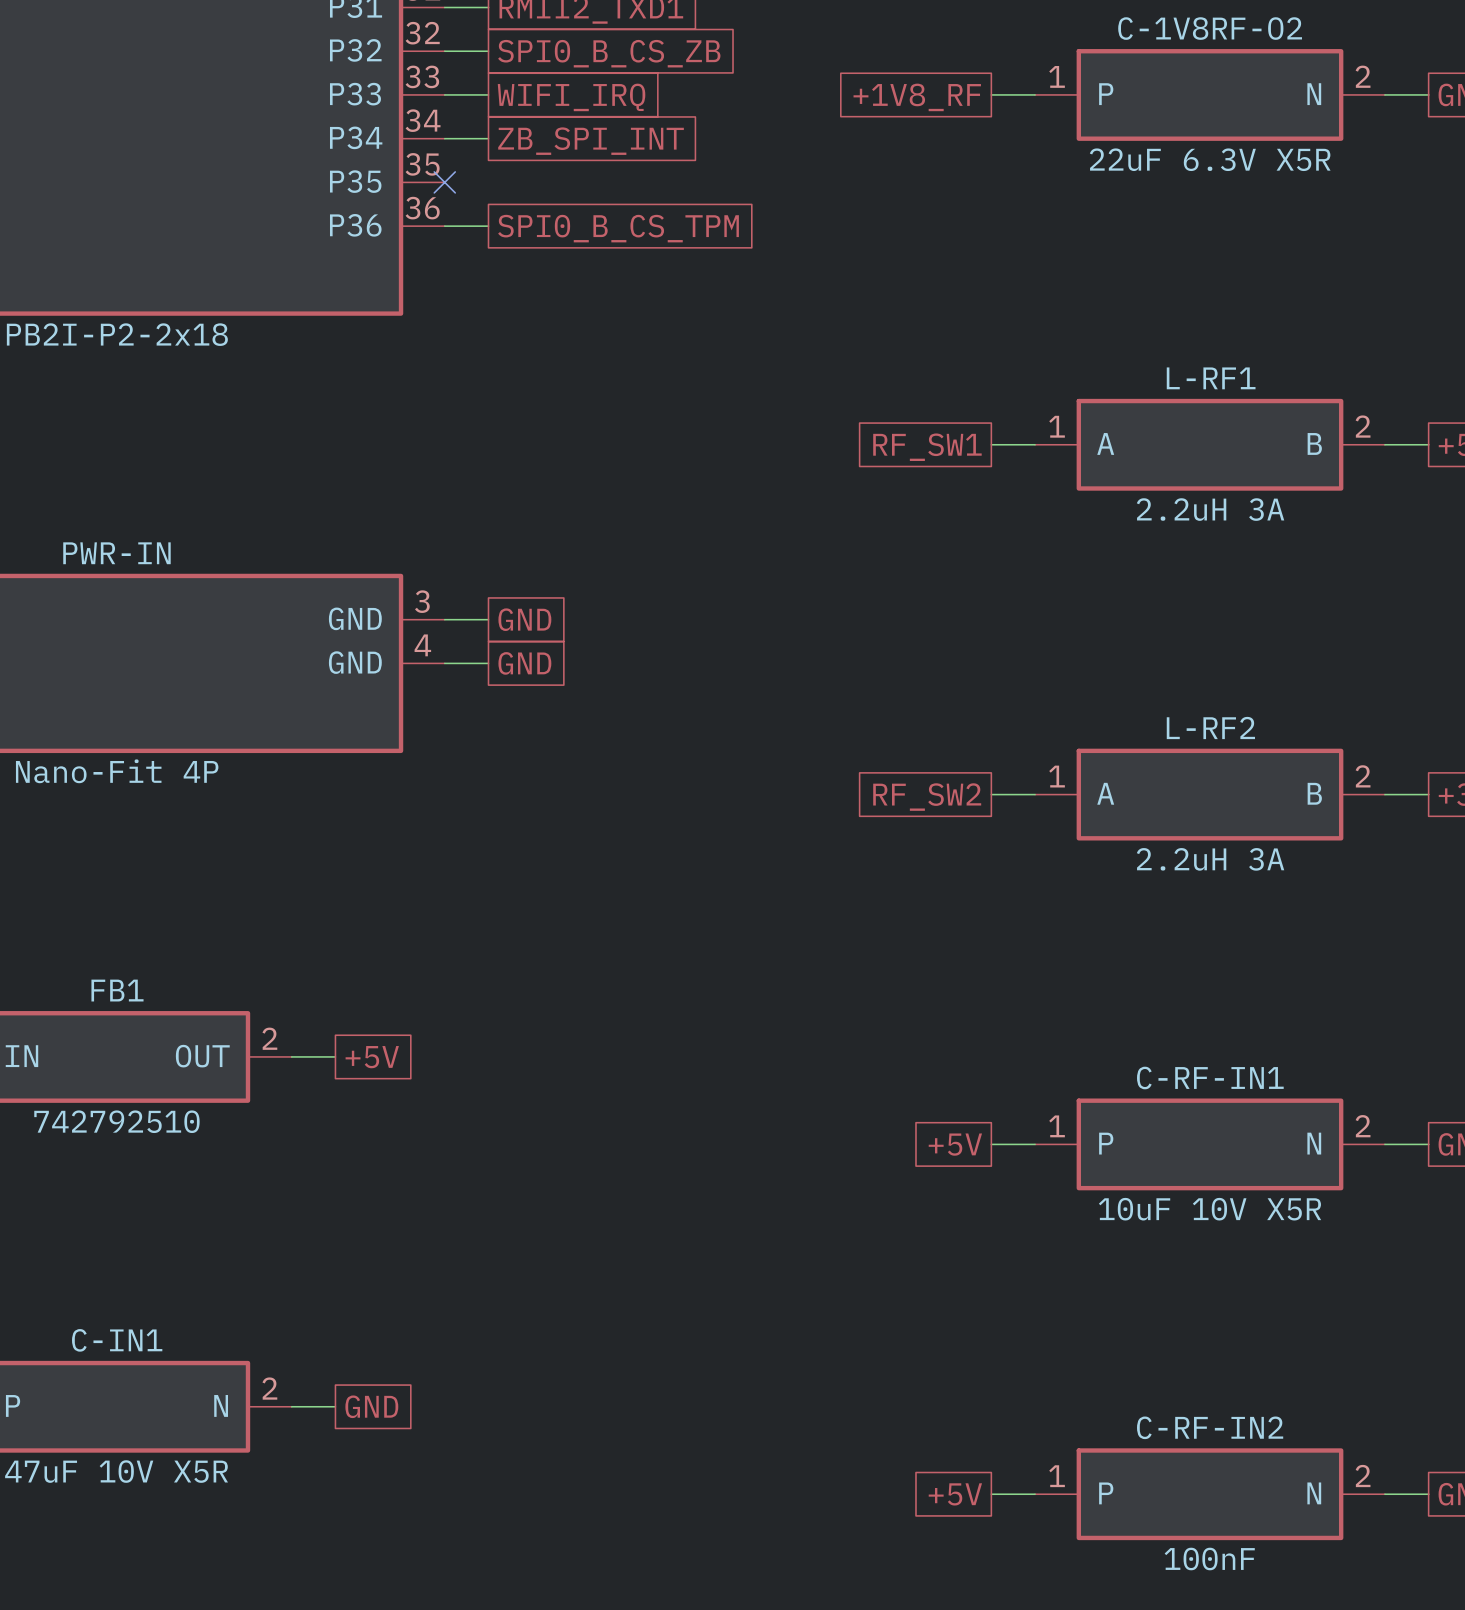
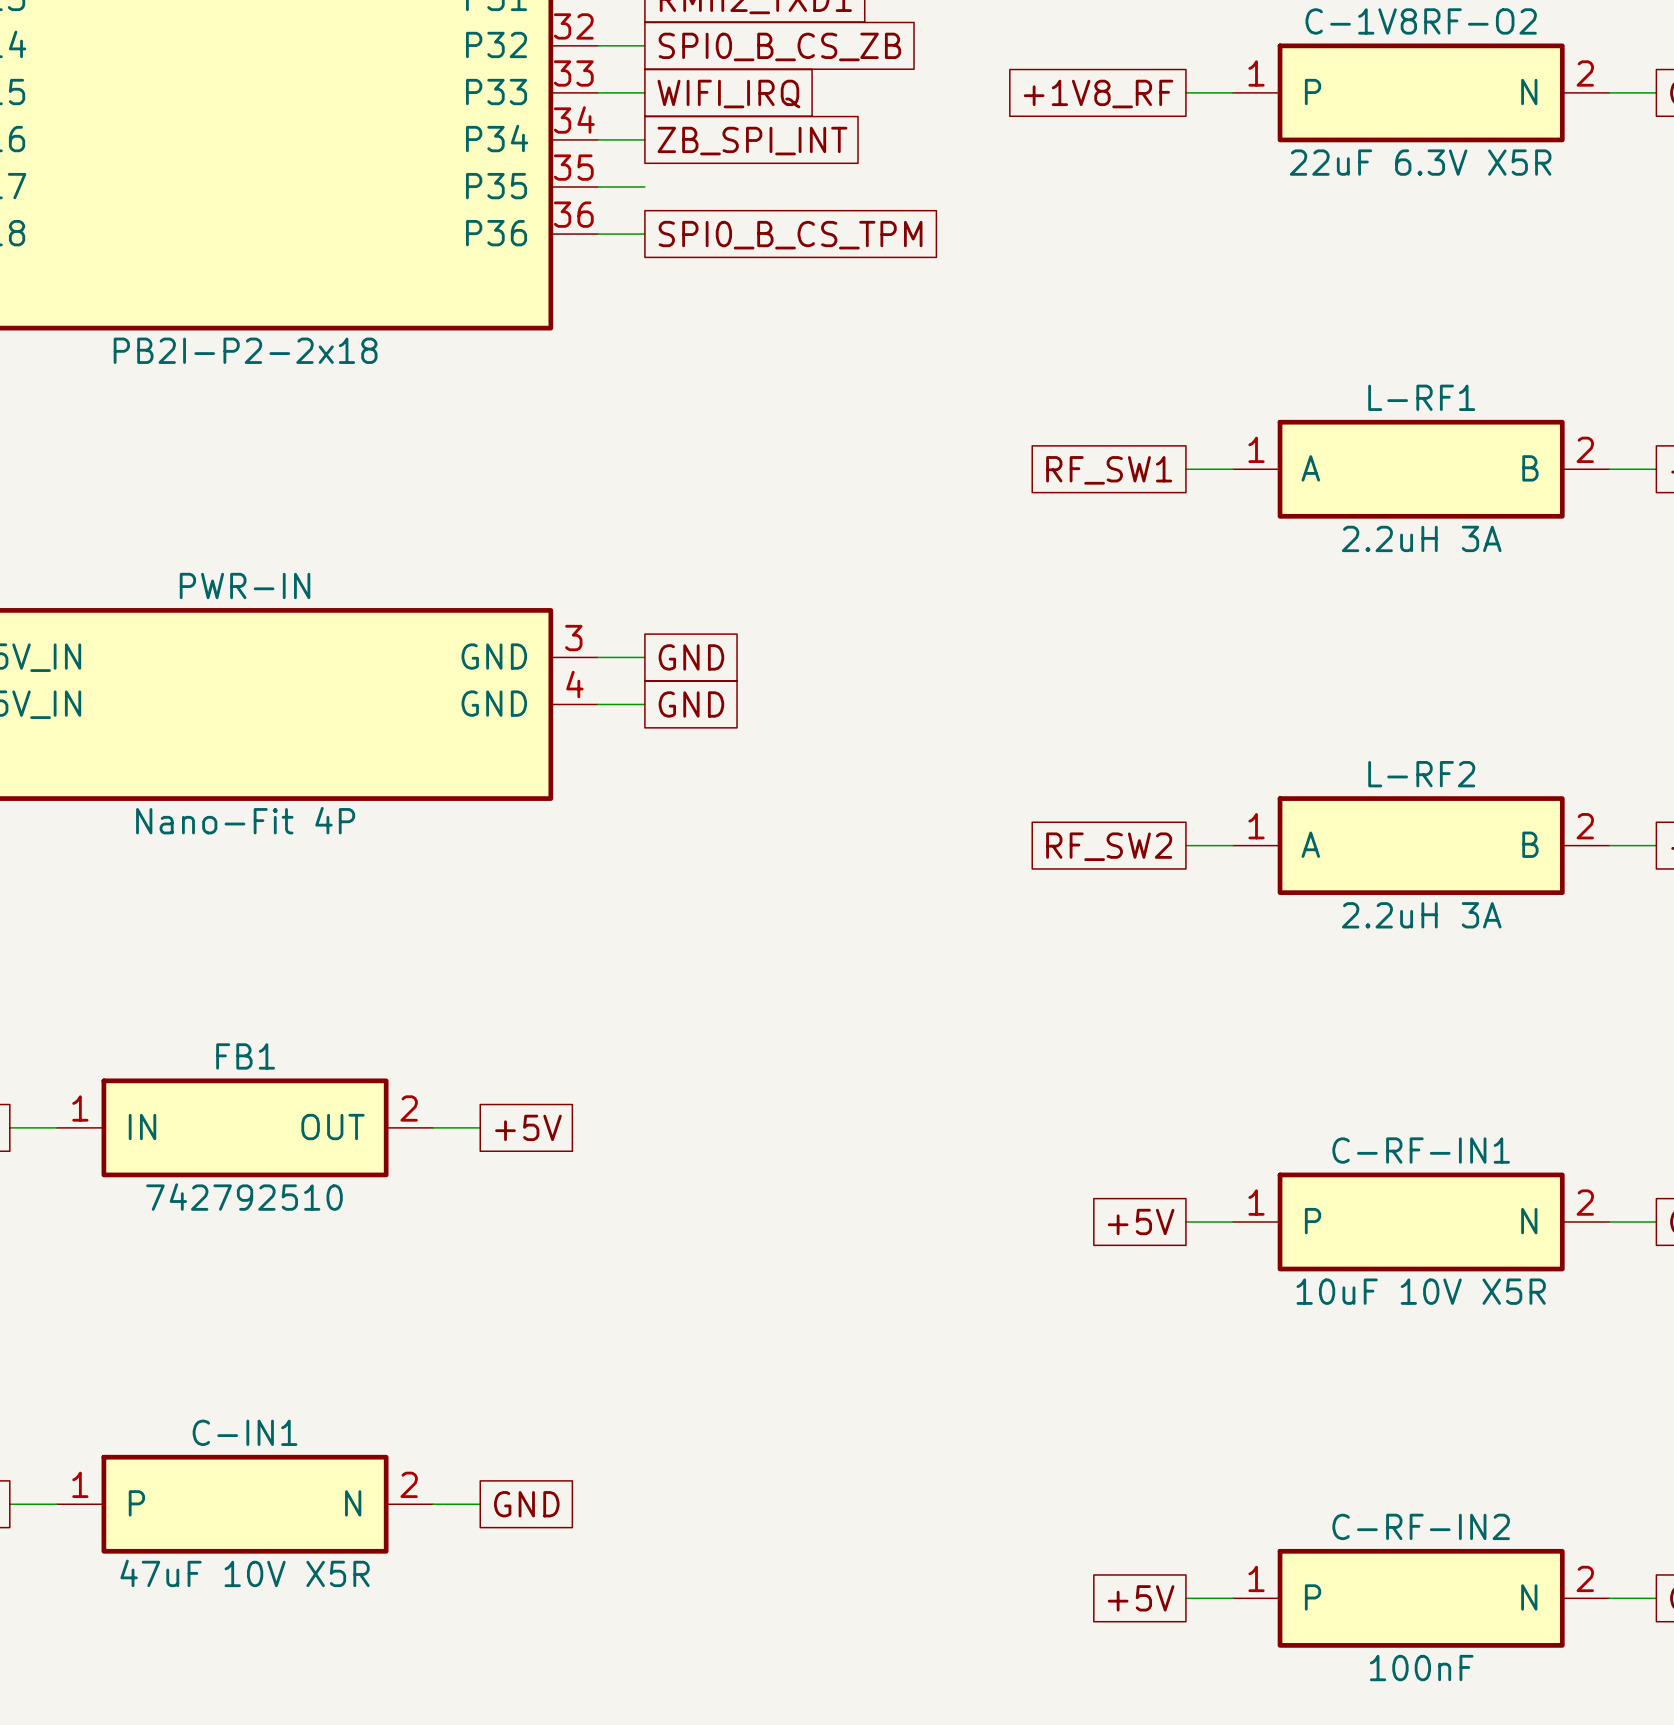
wire: none -> (597, 186) (644, 186)
no-connect mark: (444, 182) -> none

